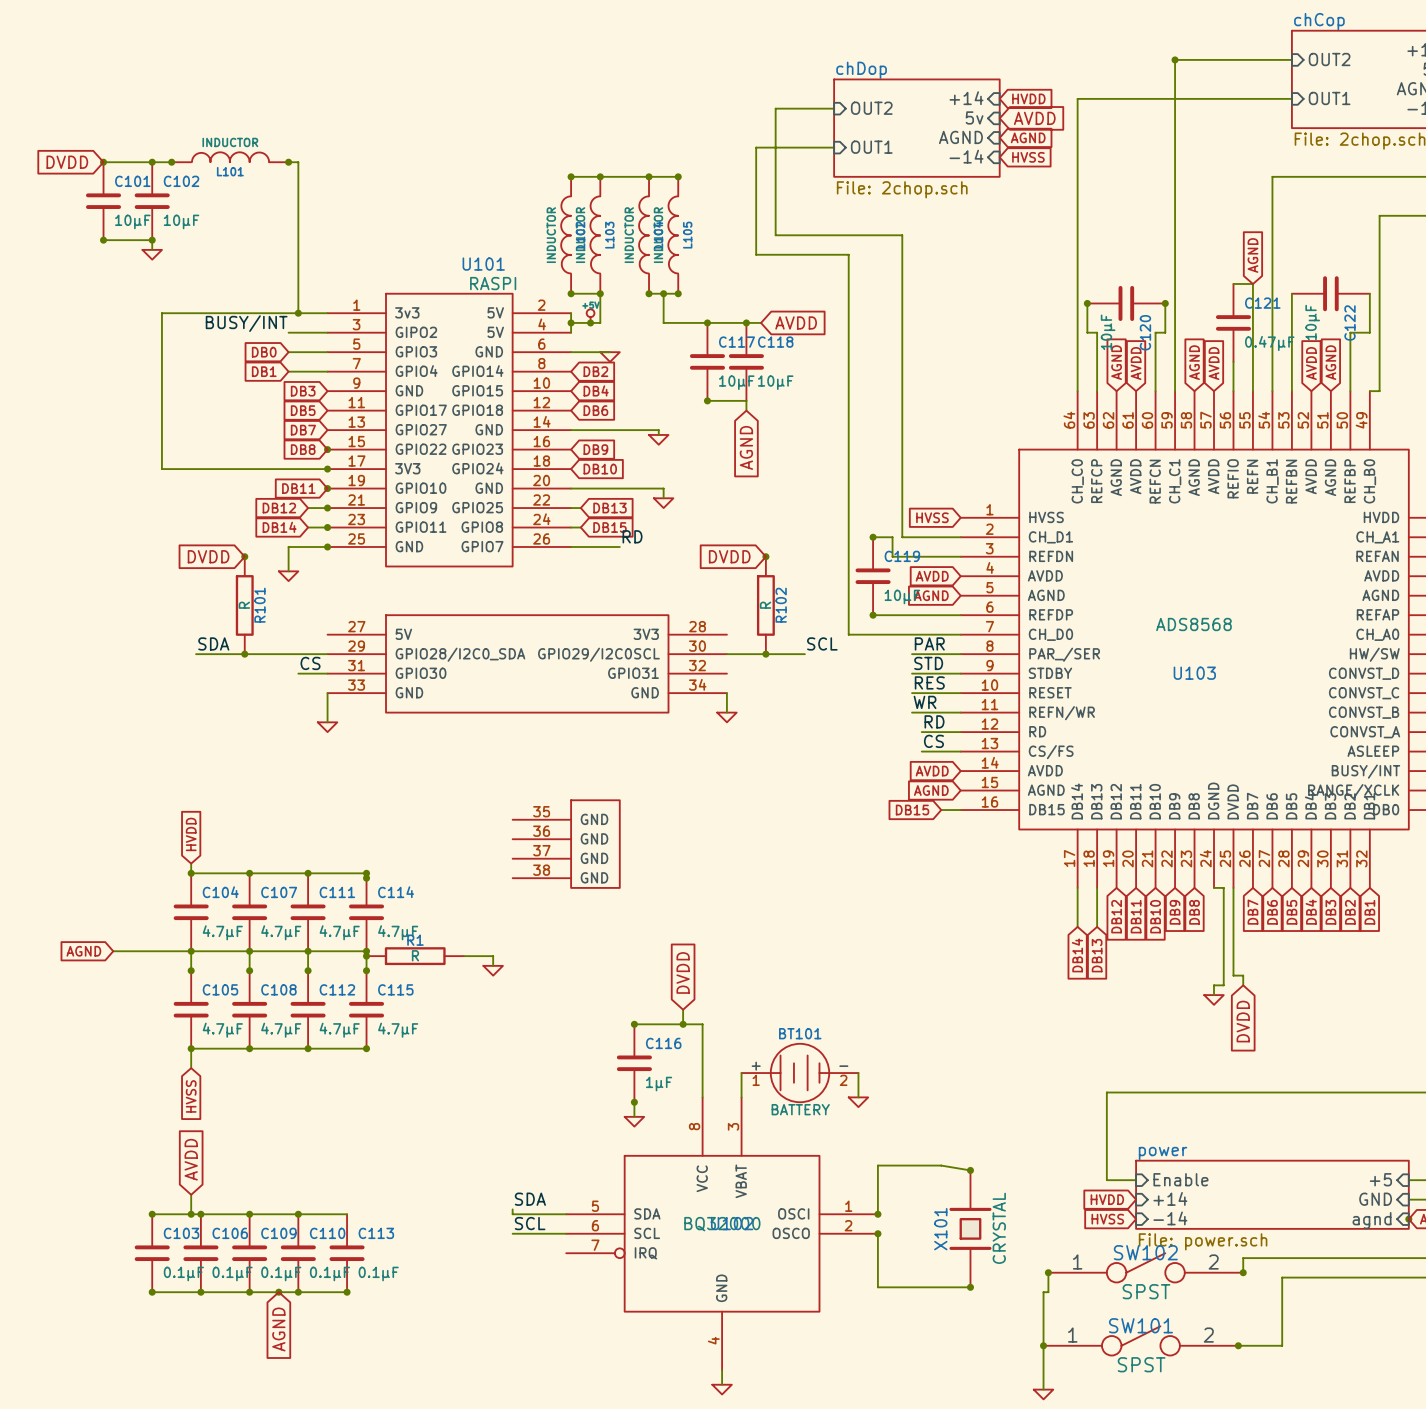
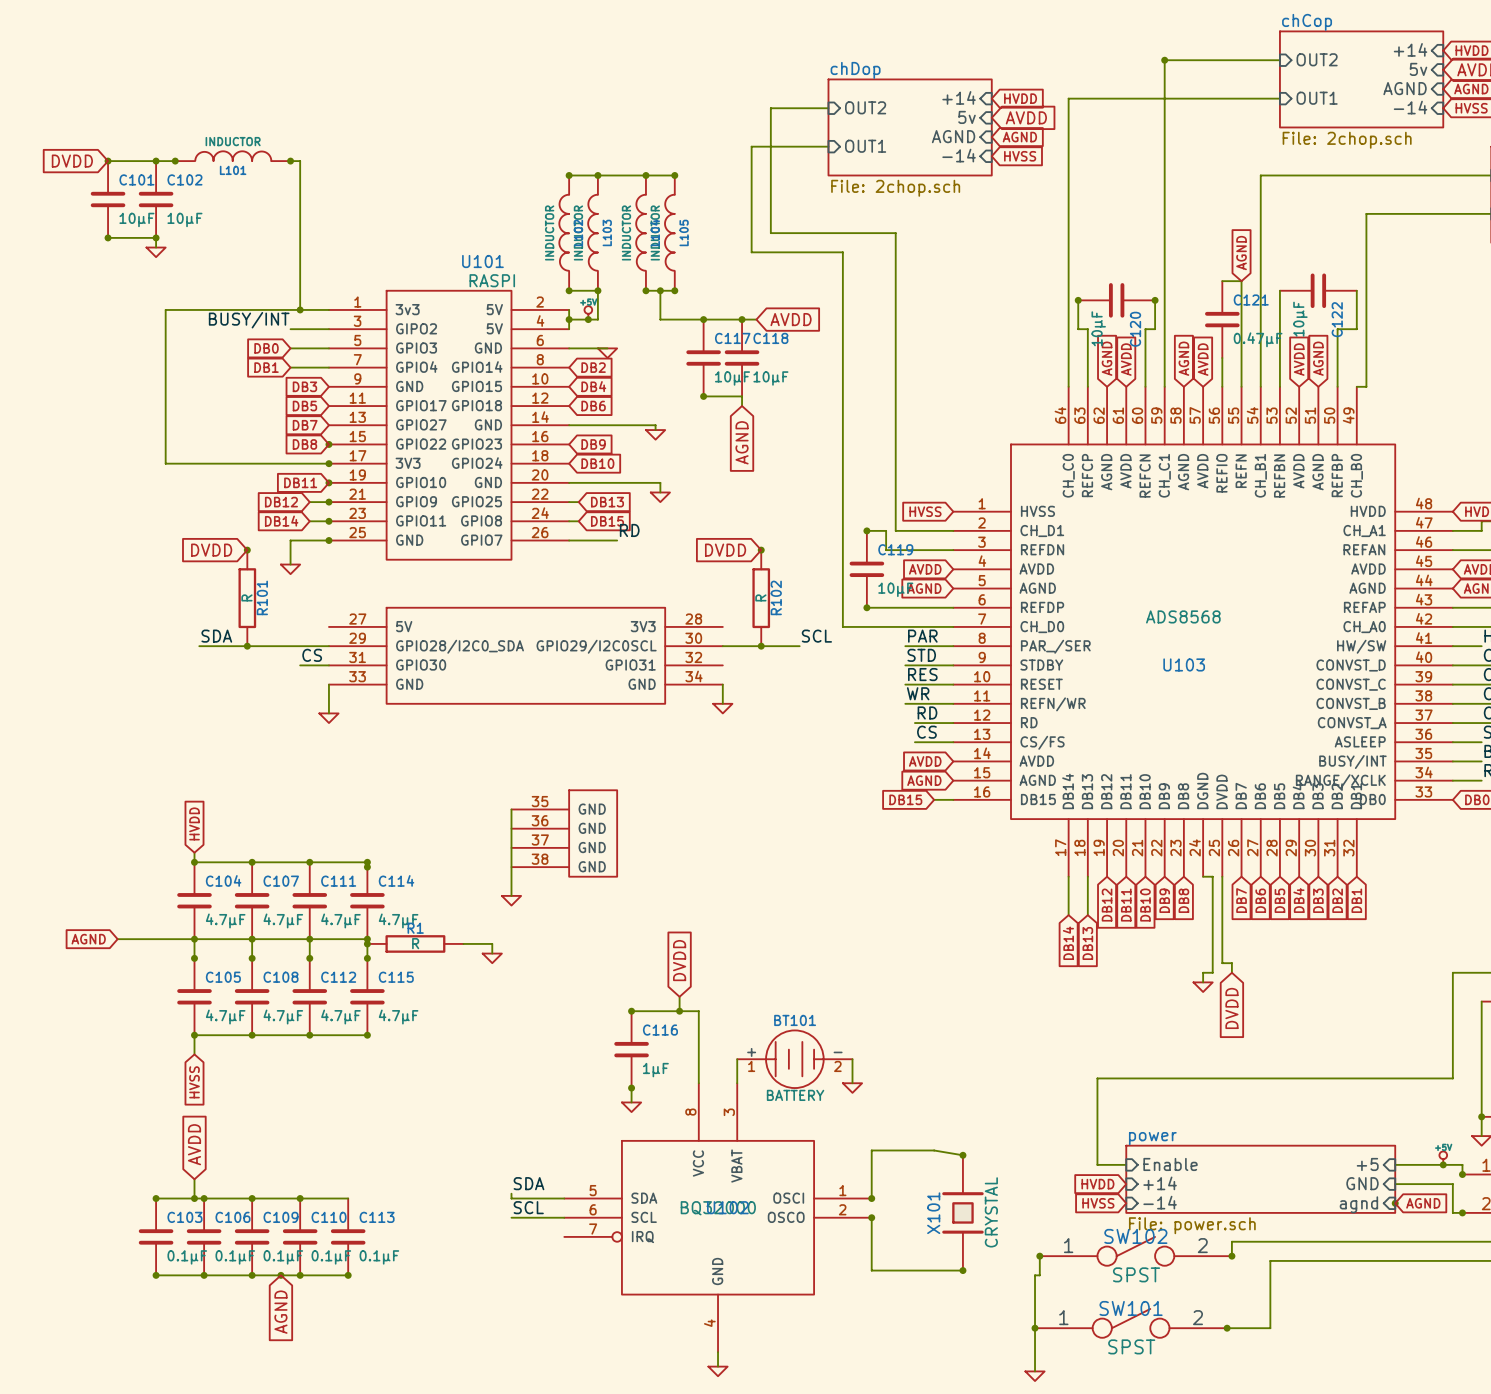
wire: none -> (511, 809) (511, 895)
power symbol: none -> (511, 900)

